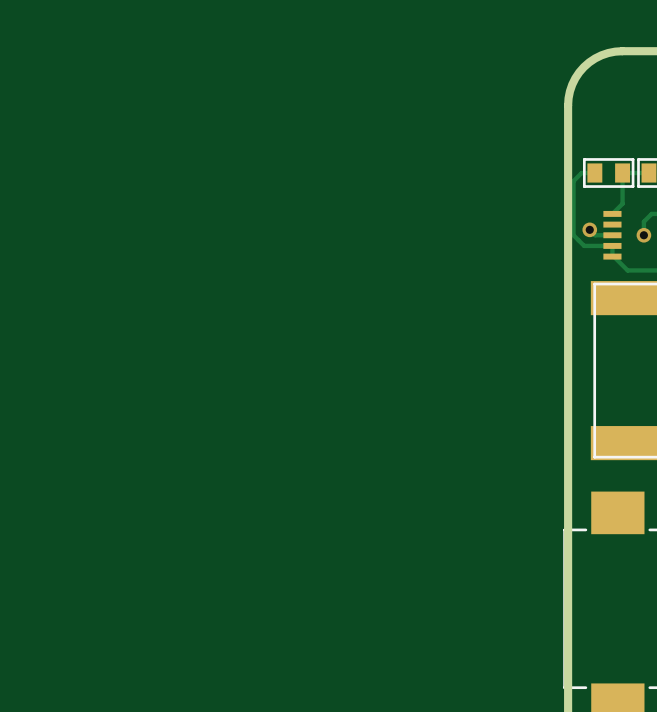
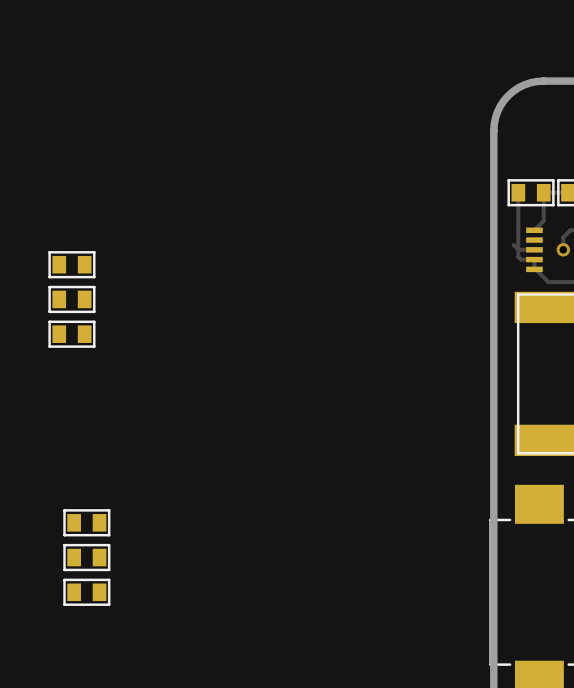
track: (594, 173) (581, 173) (573, 181) (573, 235) (584, 245) (597, 245) -> (518, 192) (518, 256) (520, 259)
via: (589, 229) -> none
part: none -> (71, 264)
part: none -> (71, 299)
part: none -> (71, 334)
part: none -> (86, 522)
part: none -> (86, 557)
part: none -> (86, 592)

